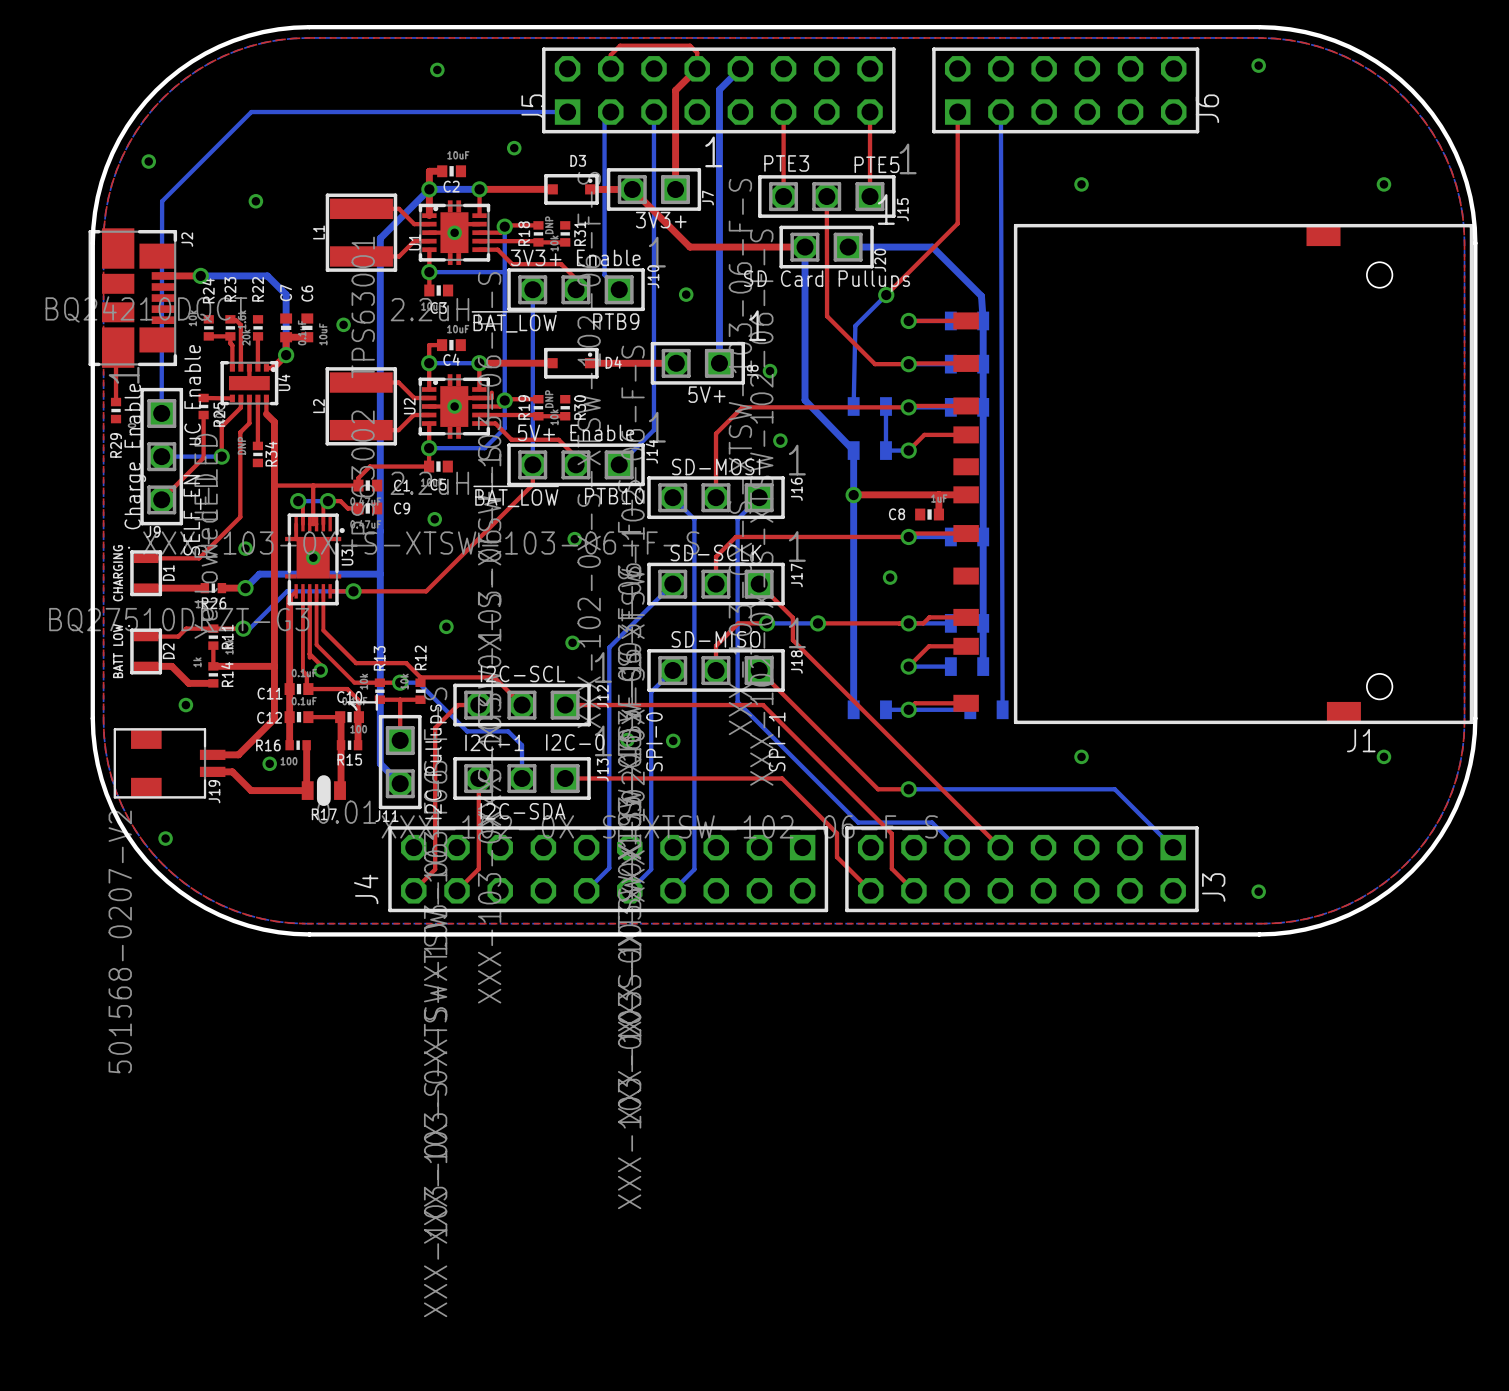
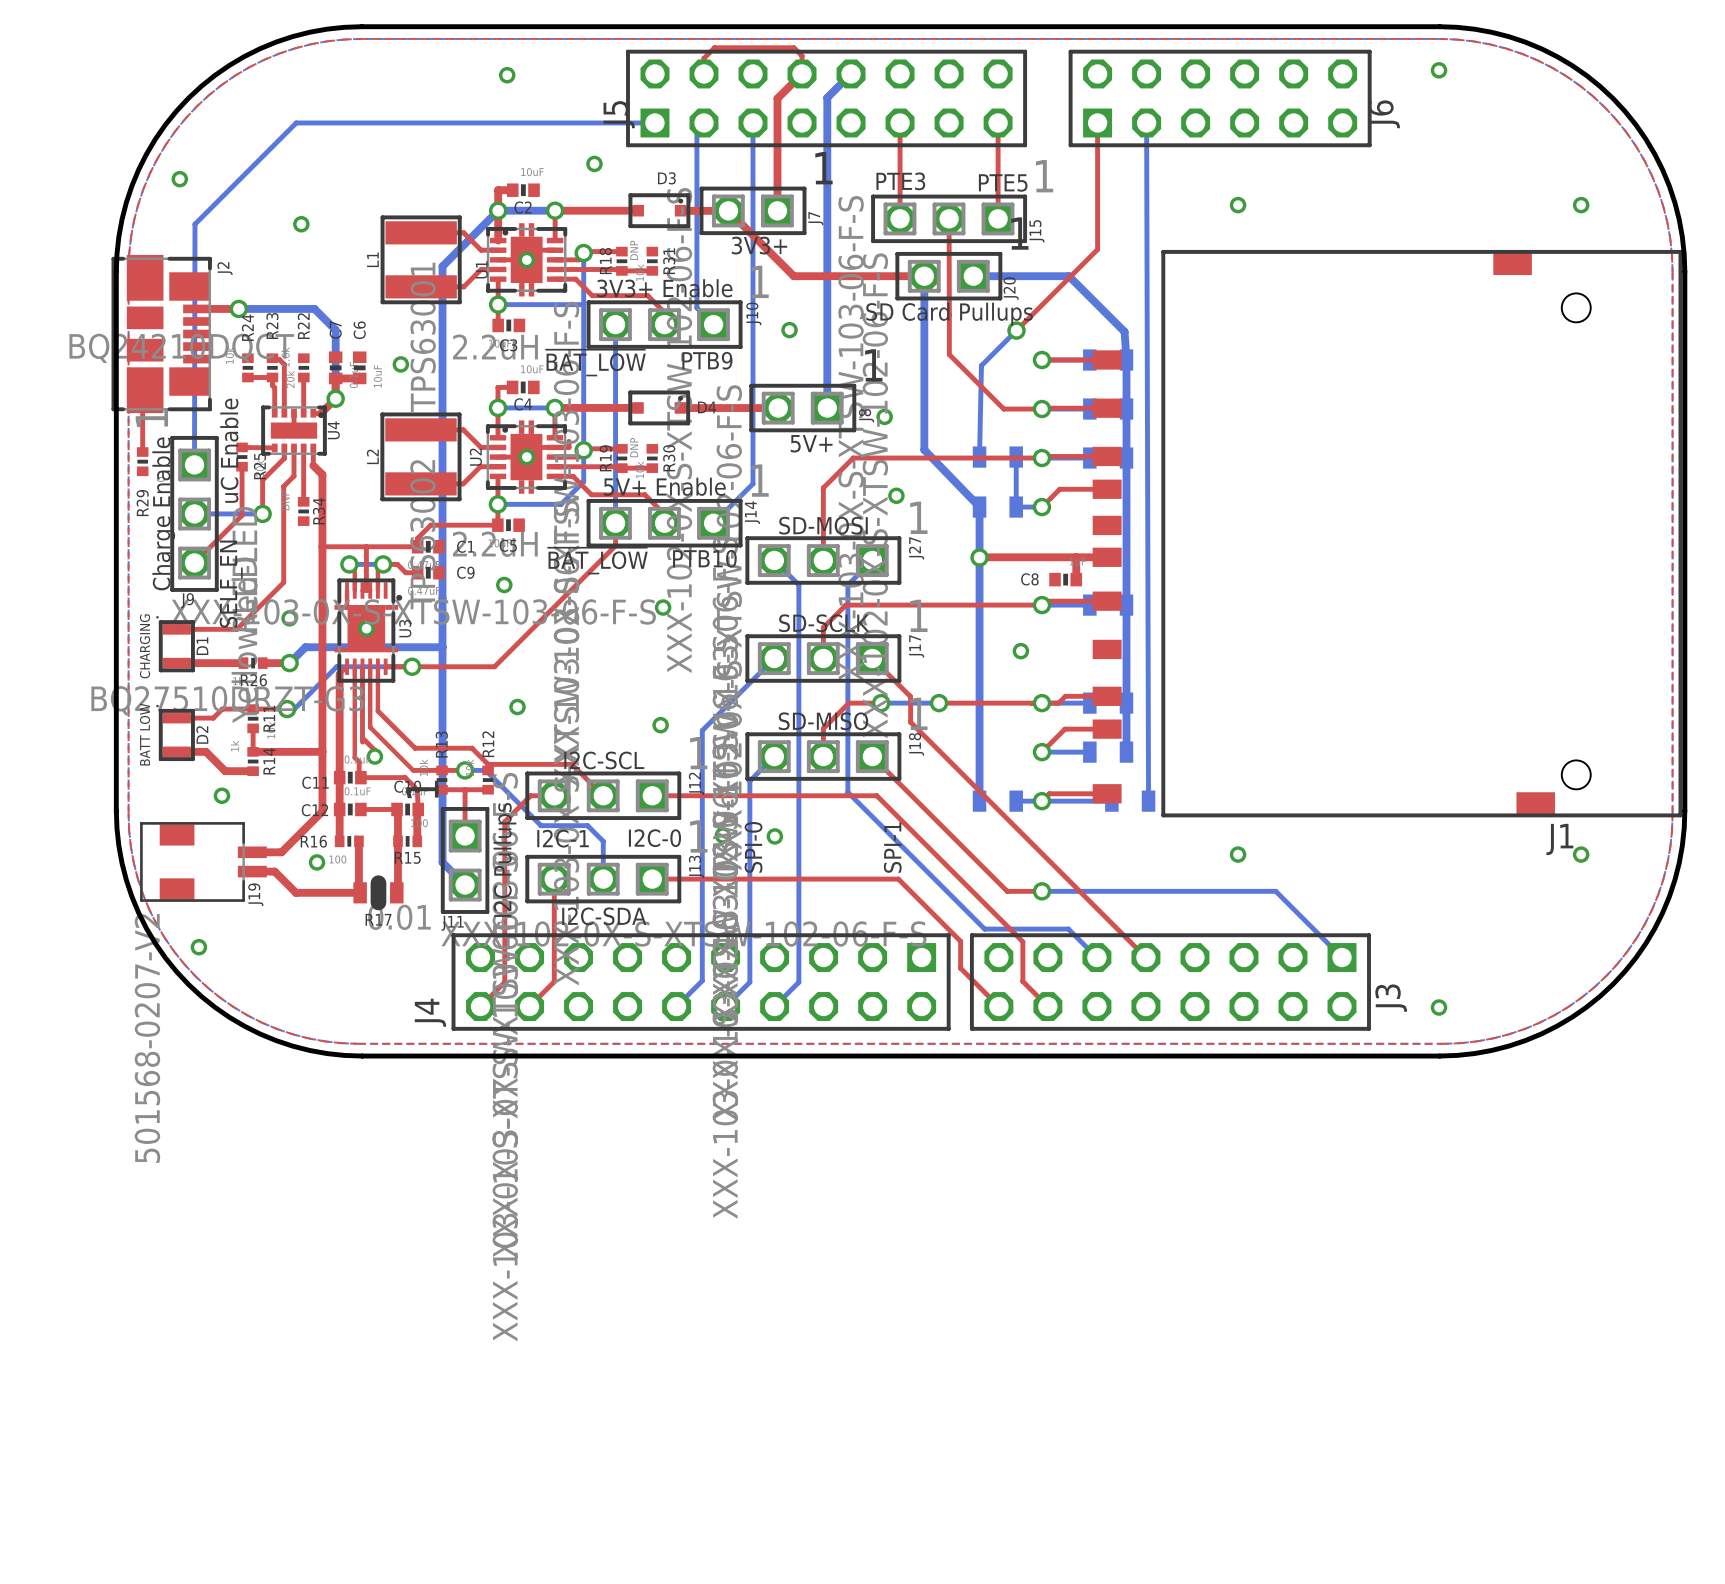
J16 name: J16 (796, 489) -> J27 (916, 548)

